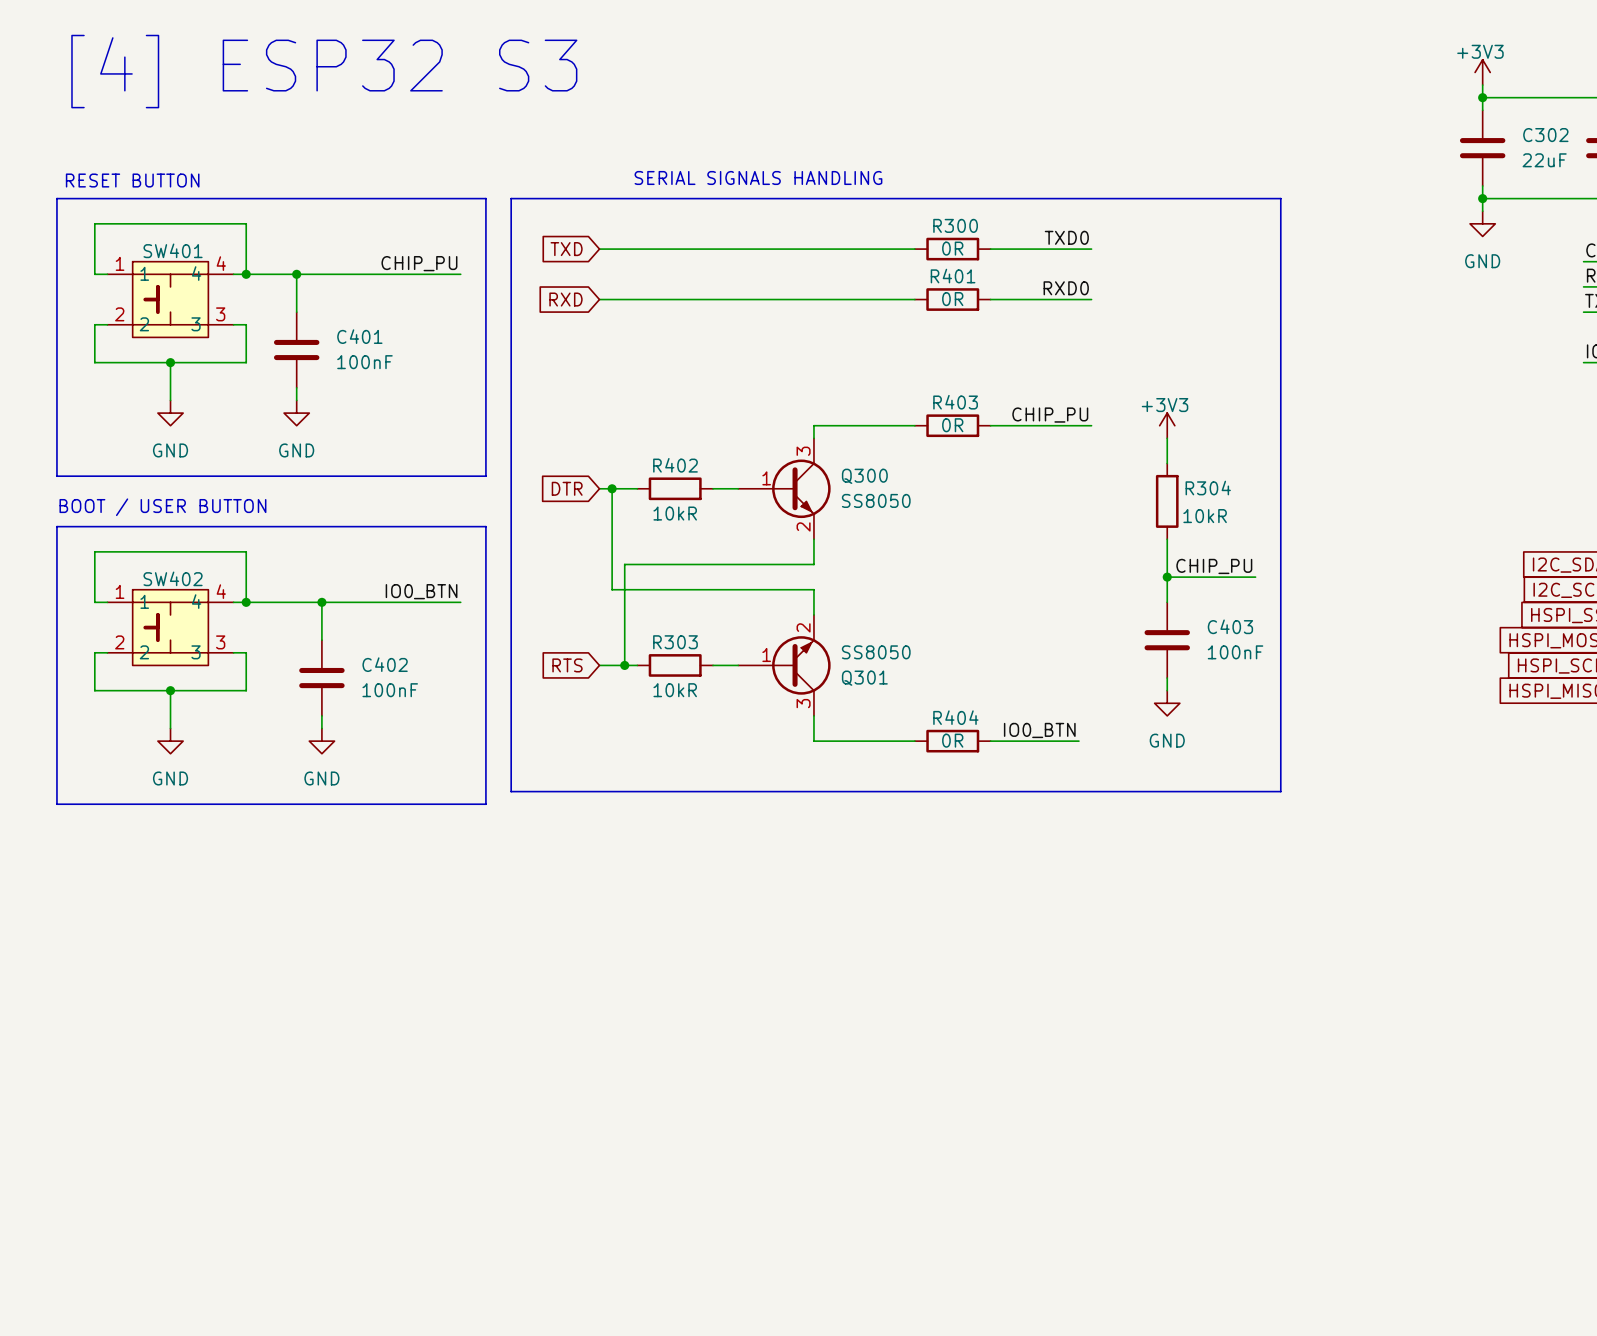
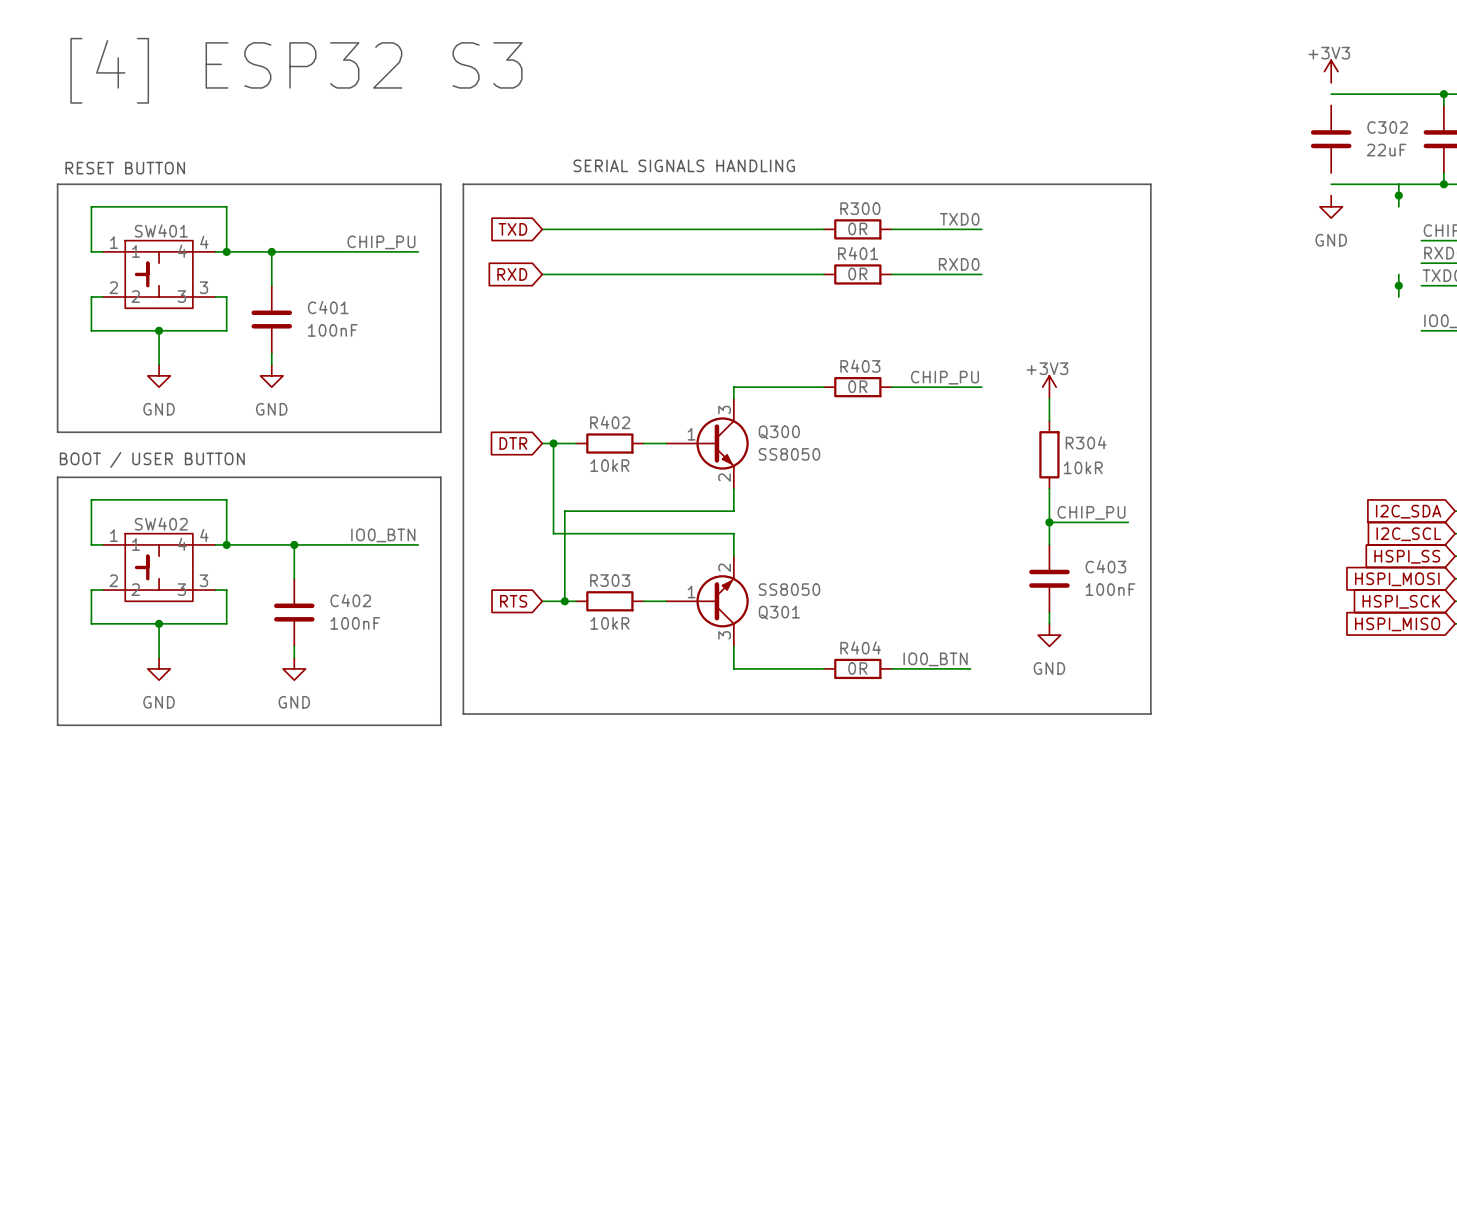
wire: (1482, 85) (1482, 110) -> (1398, 184) (1398, 206)
junction: (1482, 97) -> none
wire: (1482, 185) (1482, 211) -> (1398, 274) (1398, 296)
junction: (1482, 198) -> none
junction: none -> (1398, 195)
junction: none -> (1398, 285)

